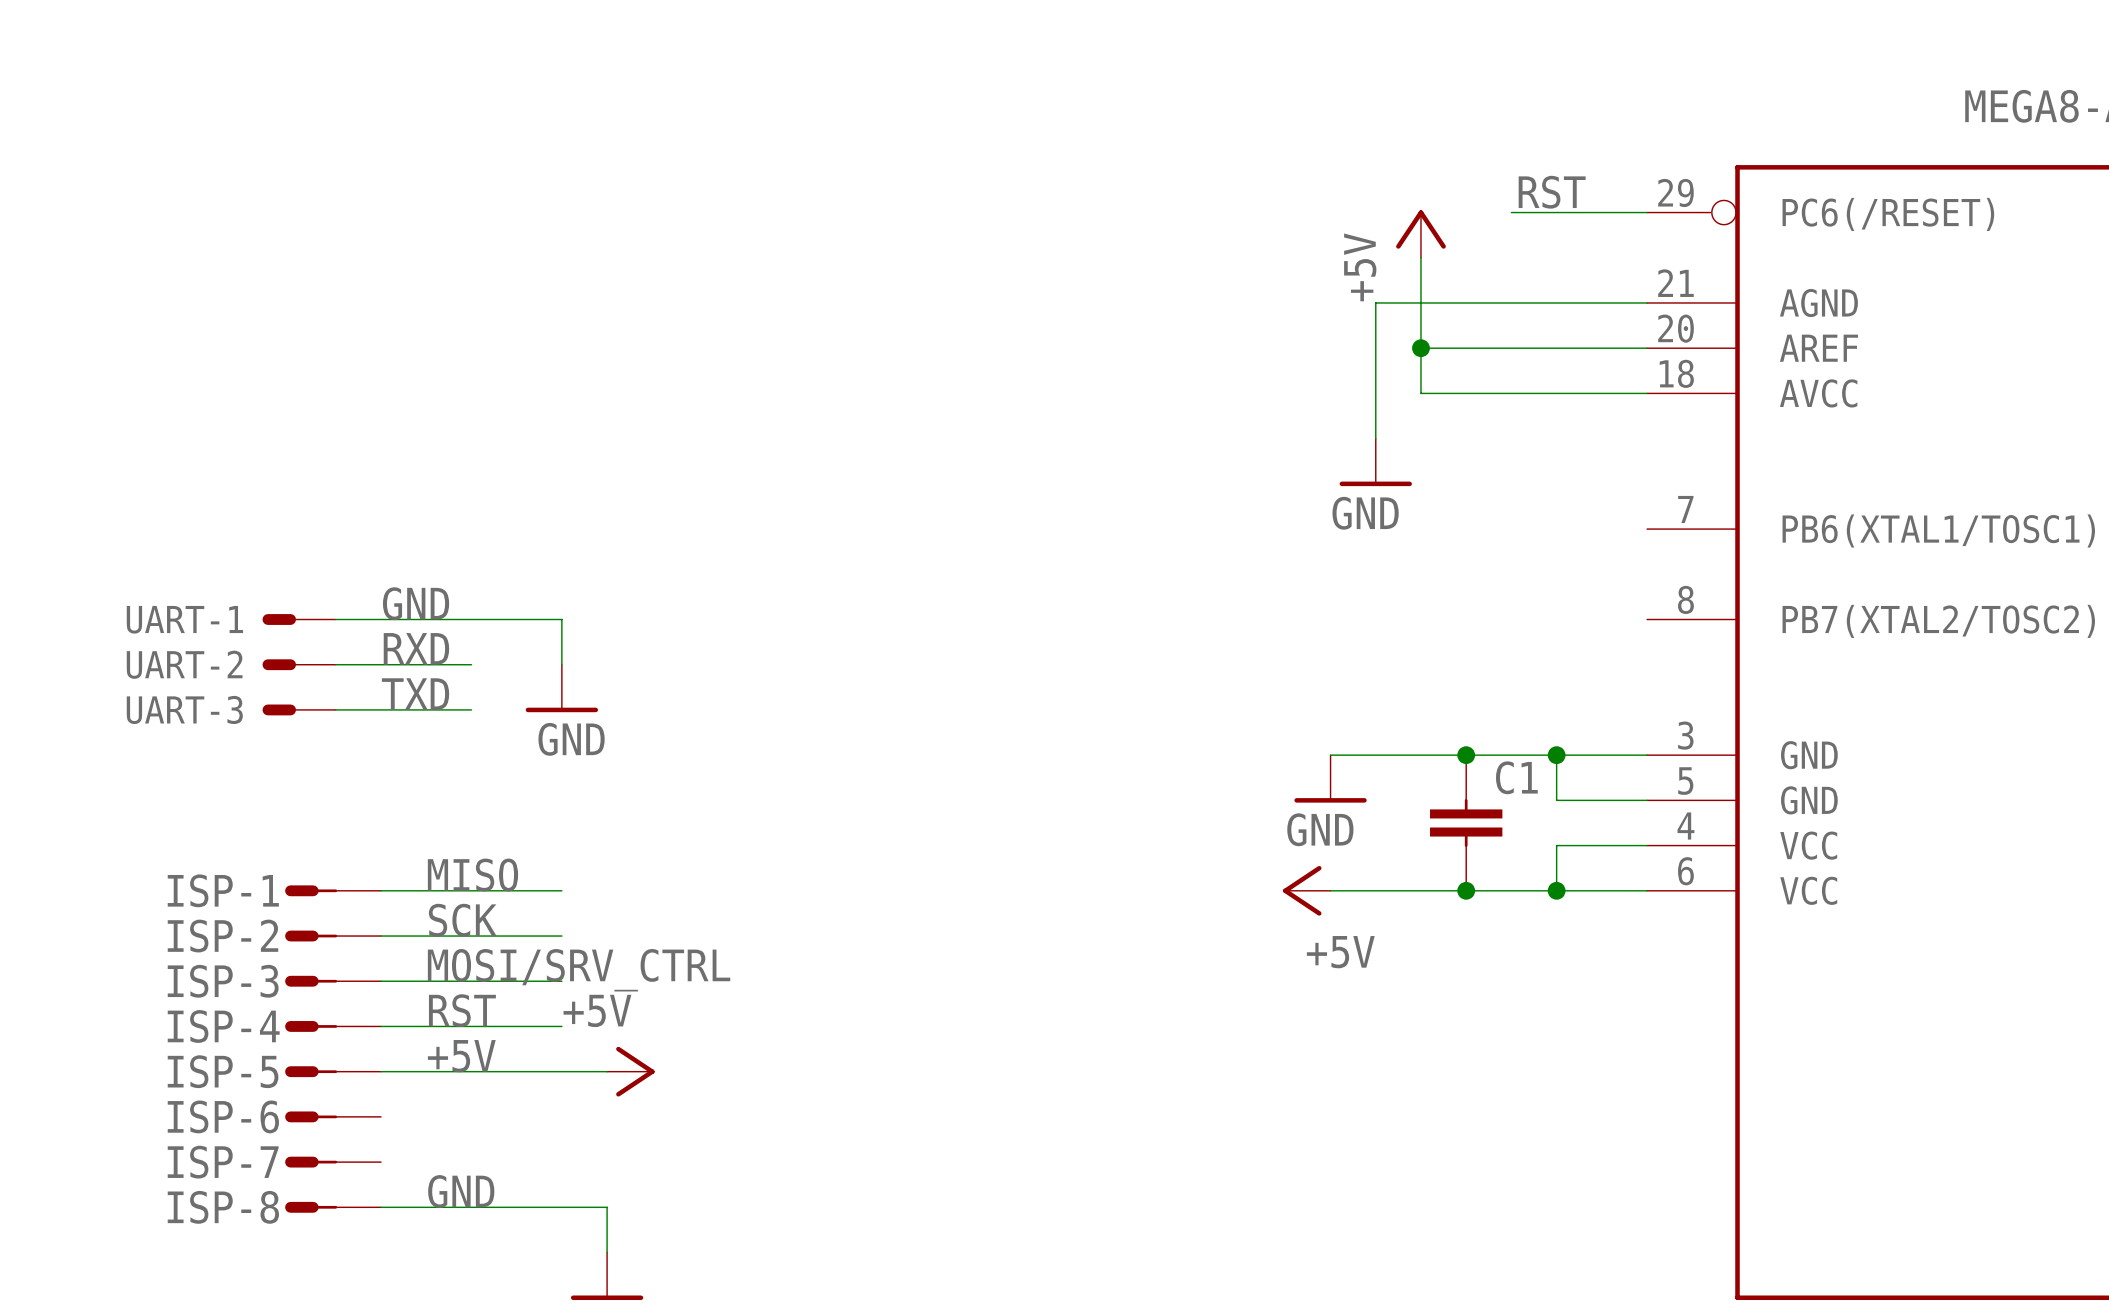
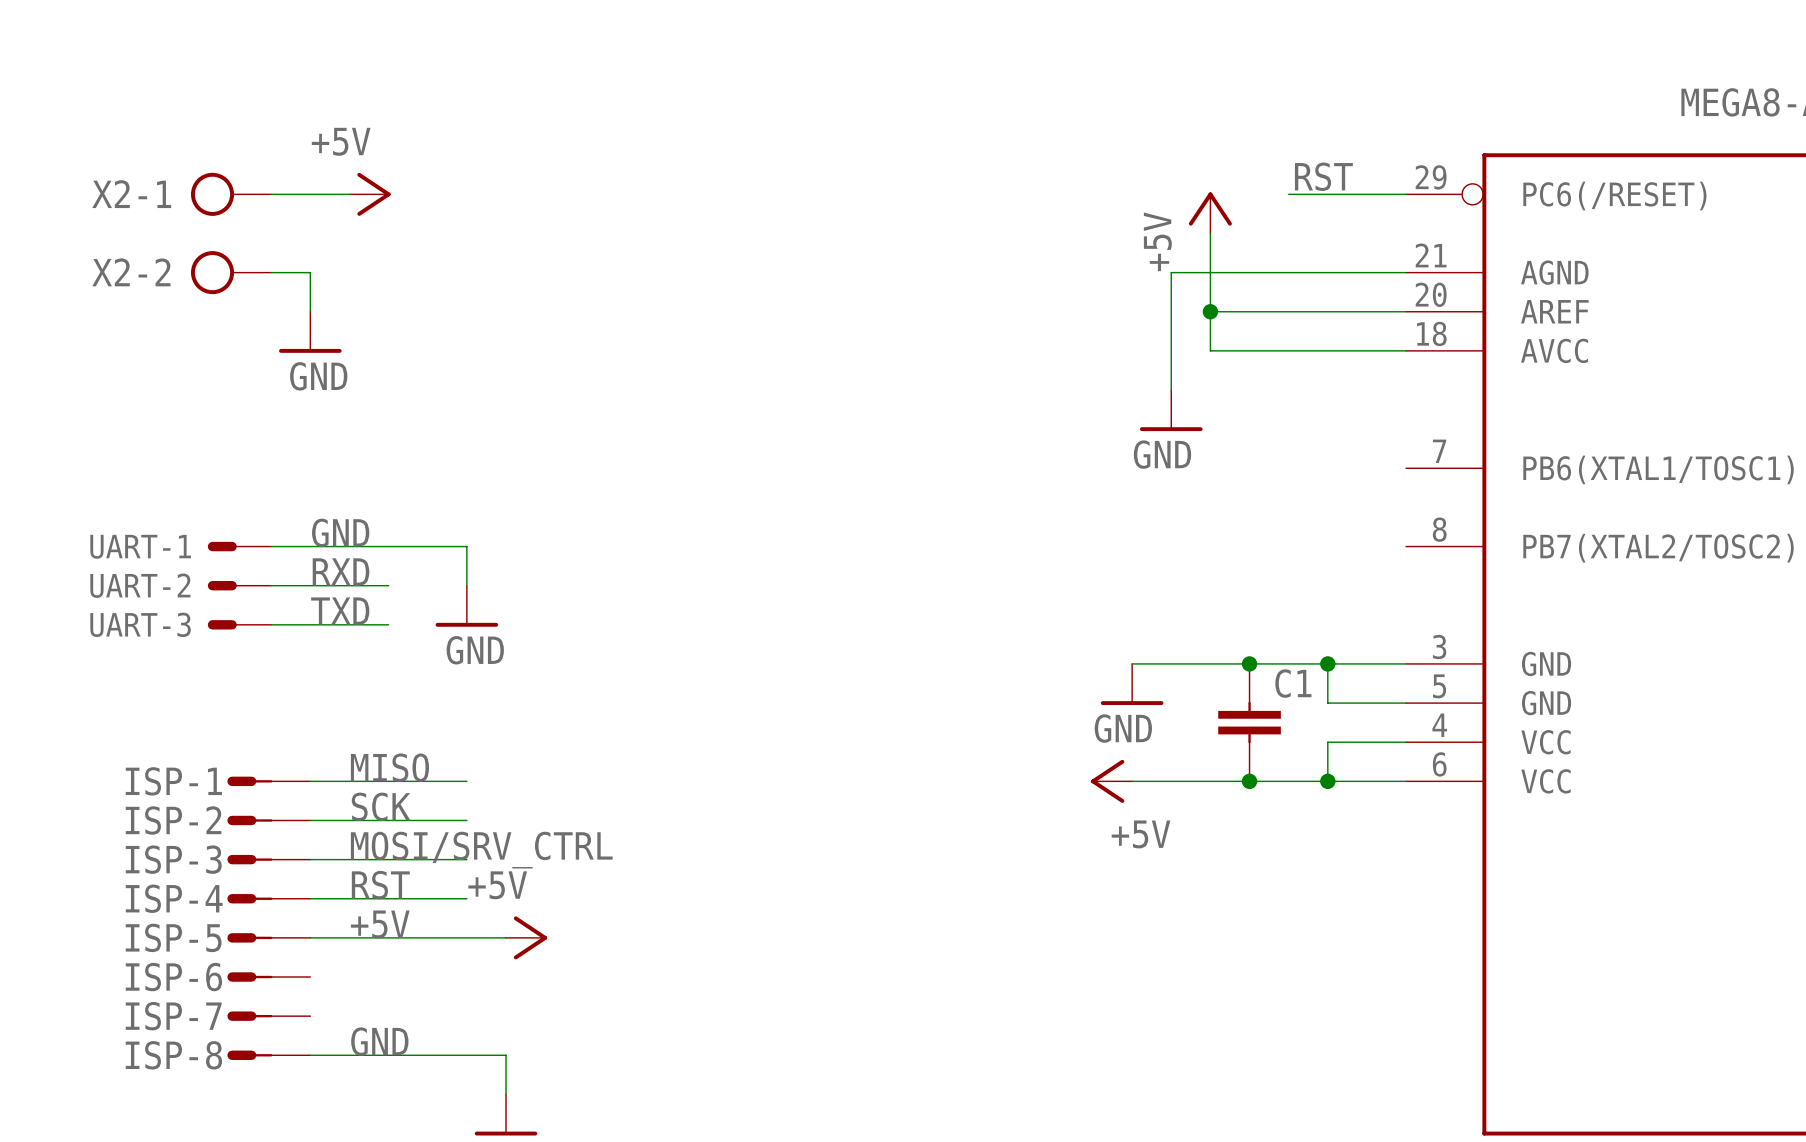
X2-1: none -> (231, 194)
wire: none -> (271, 194) (349, 194)
power symbol: none -> +5V (370, 194)
X2-2: none -> (231, 272)
wire: none -> (271, 272) (310, 272) (310, 311)
power symbol: none -> GND (310, 332)

